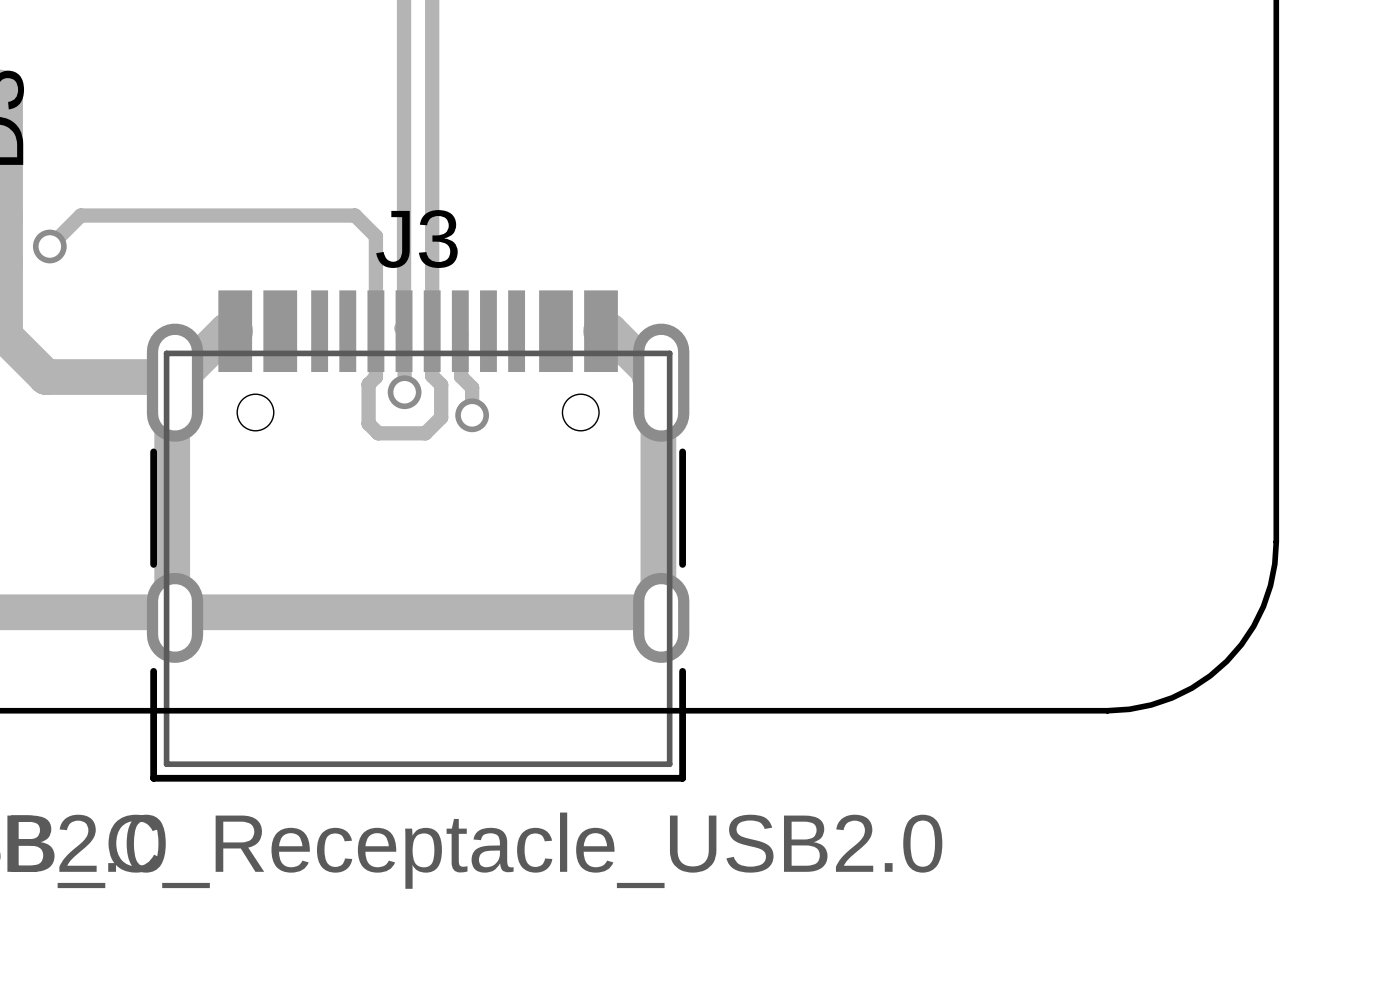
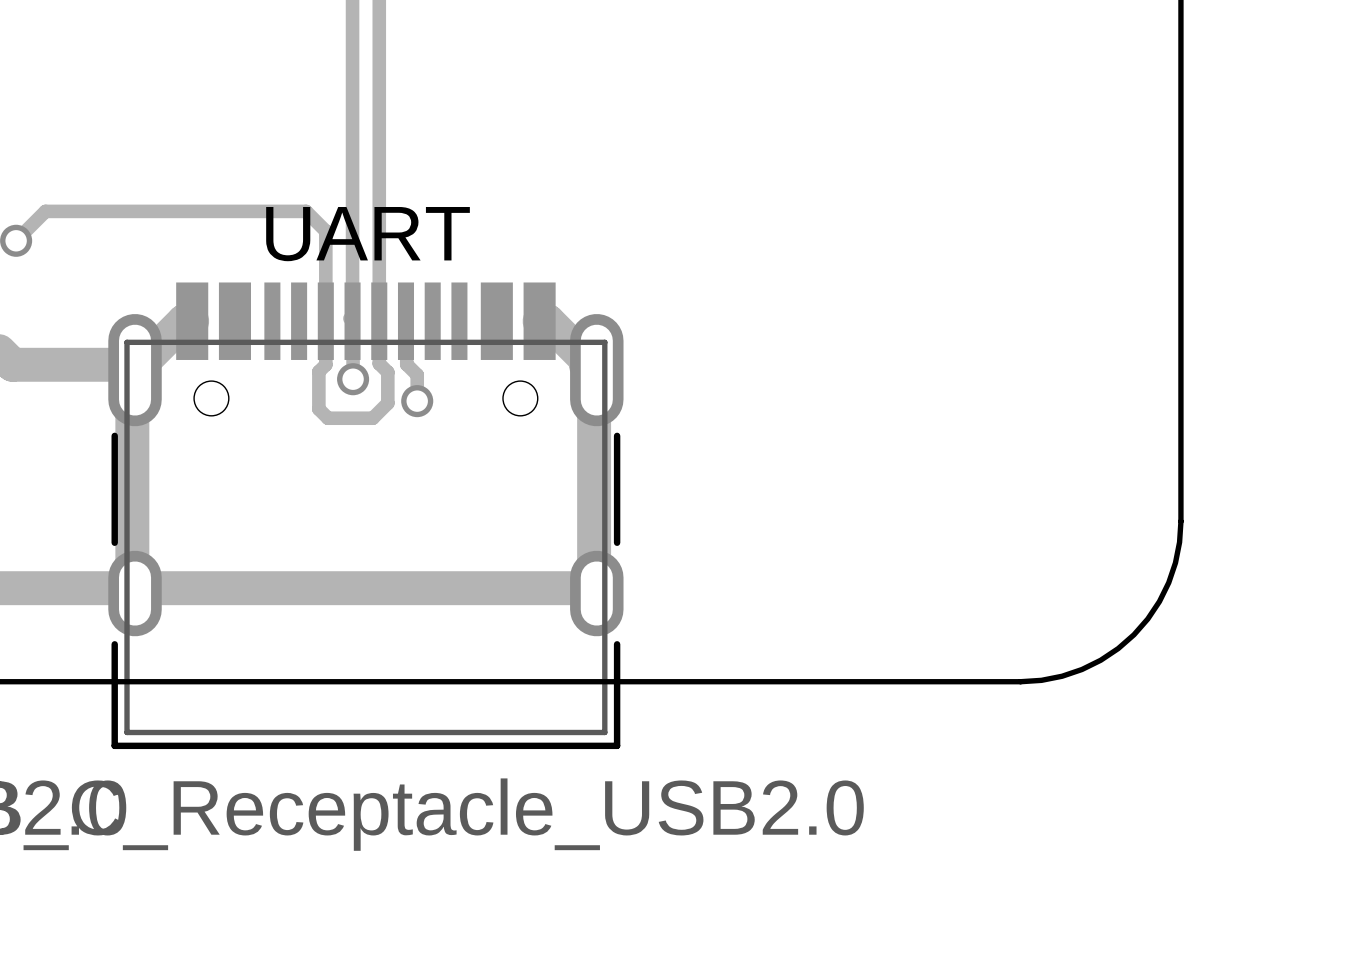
J3 name: J3 (416, 239) -> UART (368, 234)

